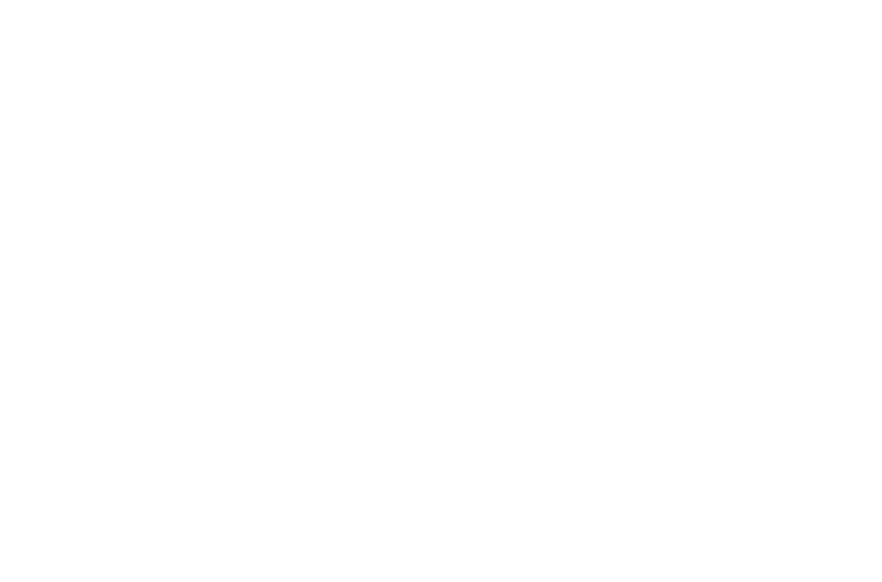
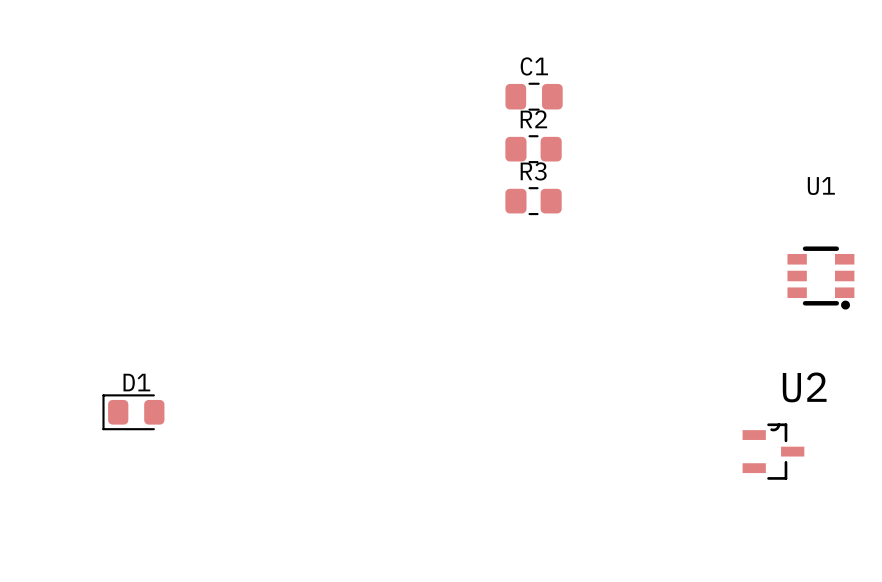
C1: none -> (534, 96)
R2: none -> (533, 149)
R3: none -> (533, 201)
U1: none -> (820, 278)
D1: none -> (133, 412)
U2: none -> (773, 451)

